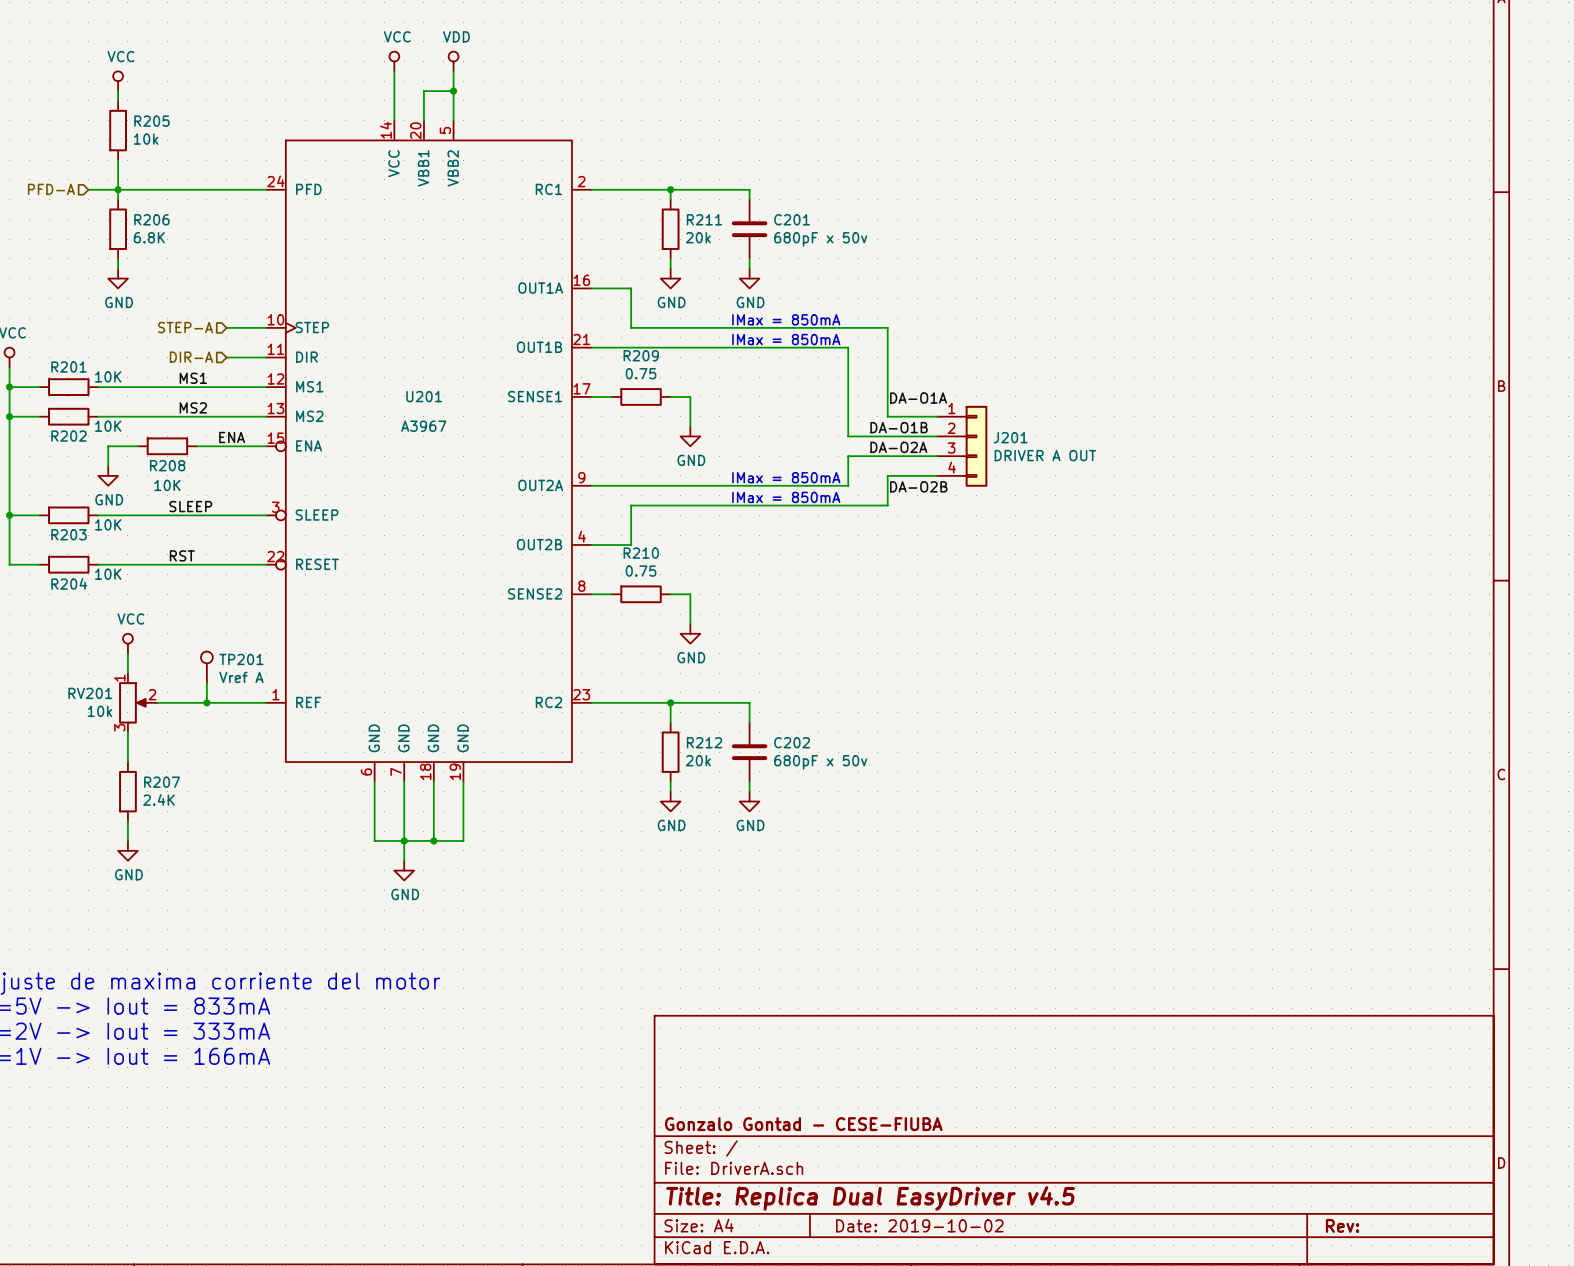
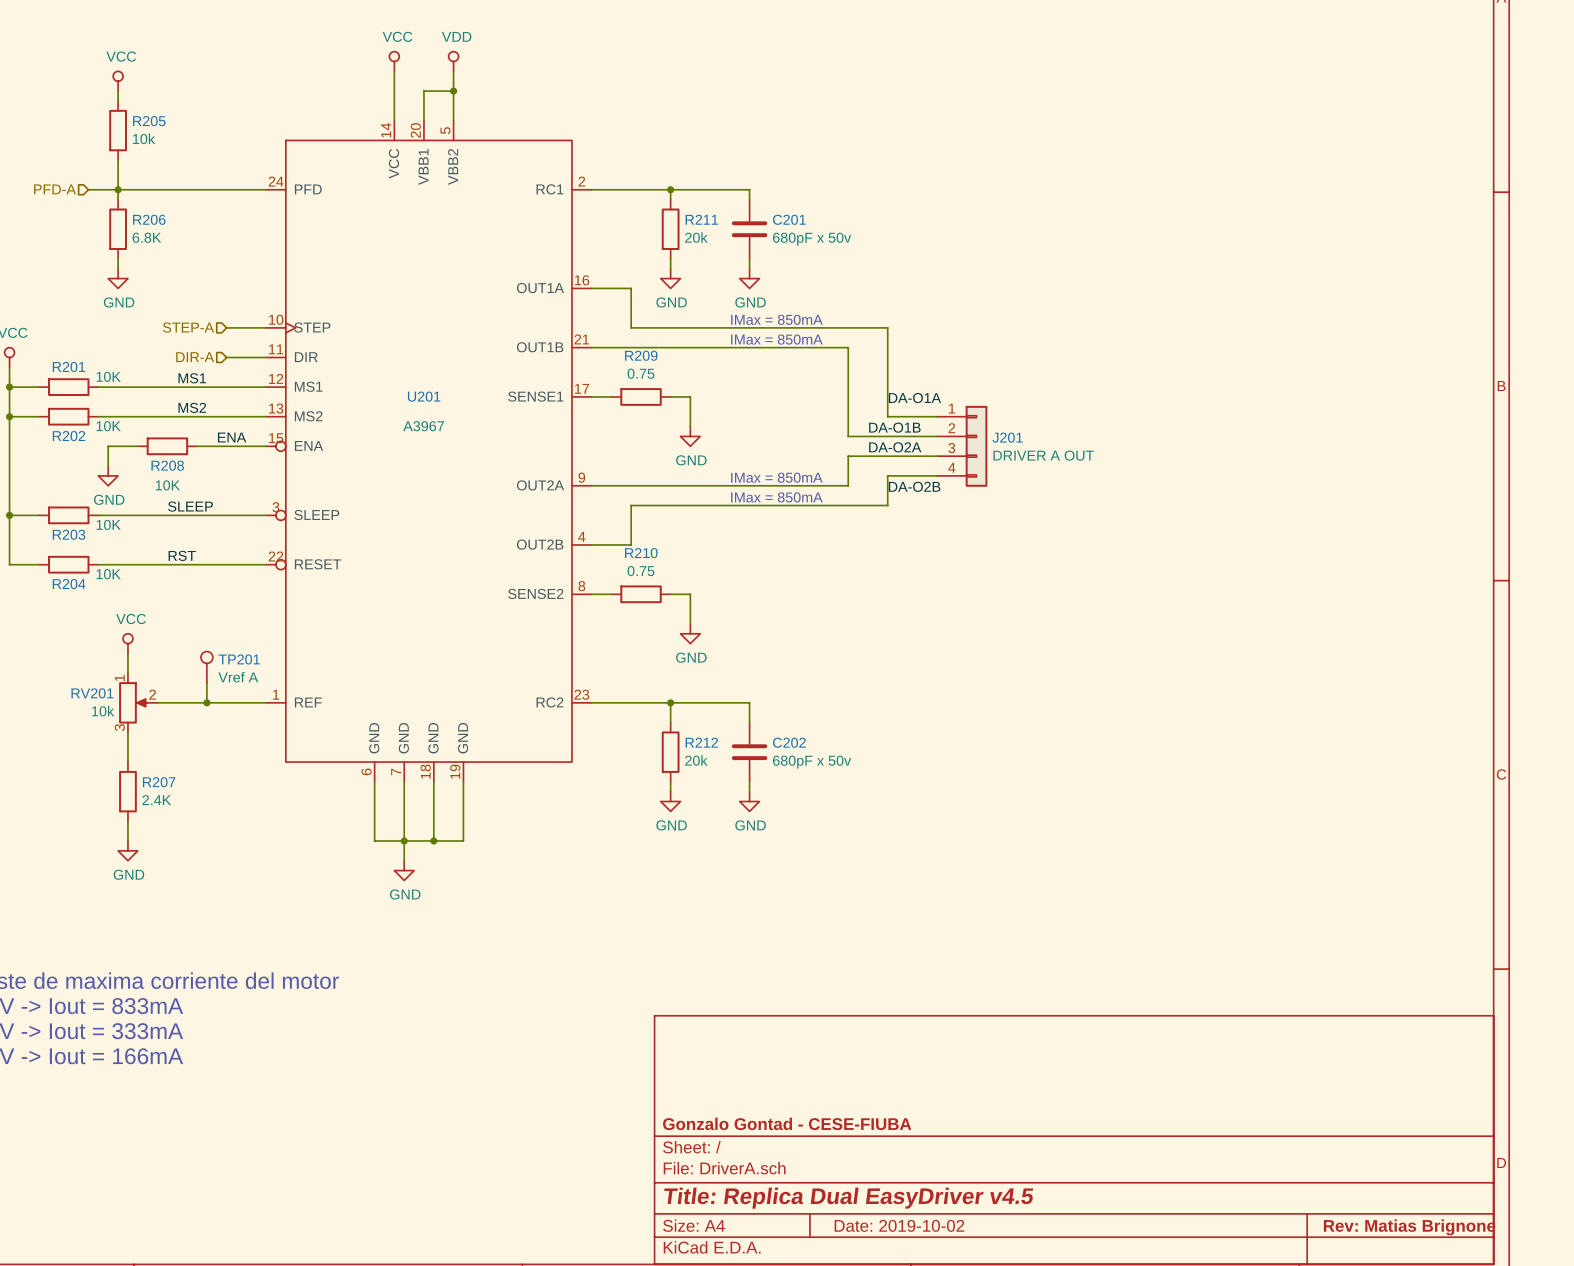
title block: Rev: (1342, 1225) -> Rev: Matias Brignone (1409, 1227)

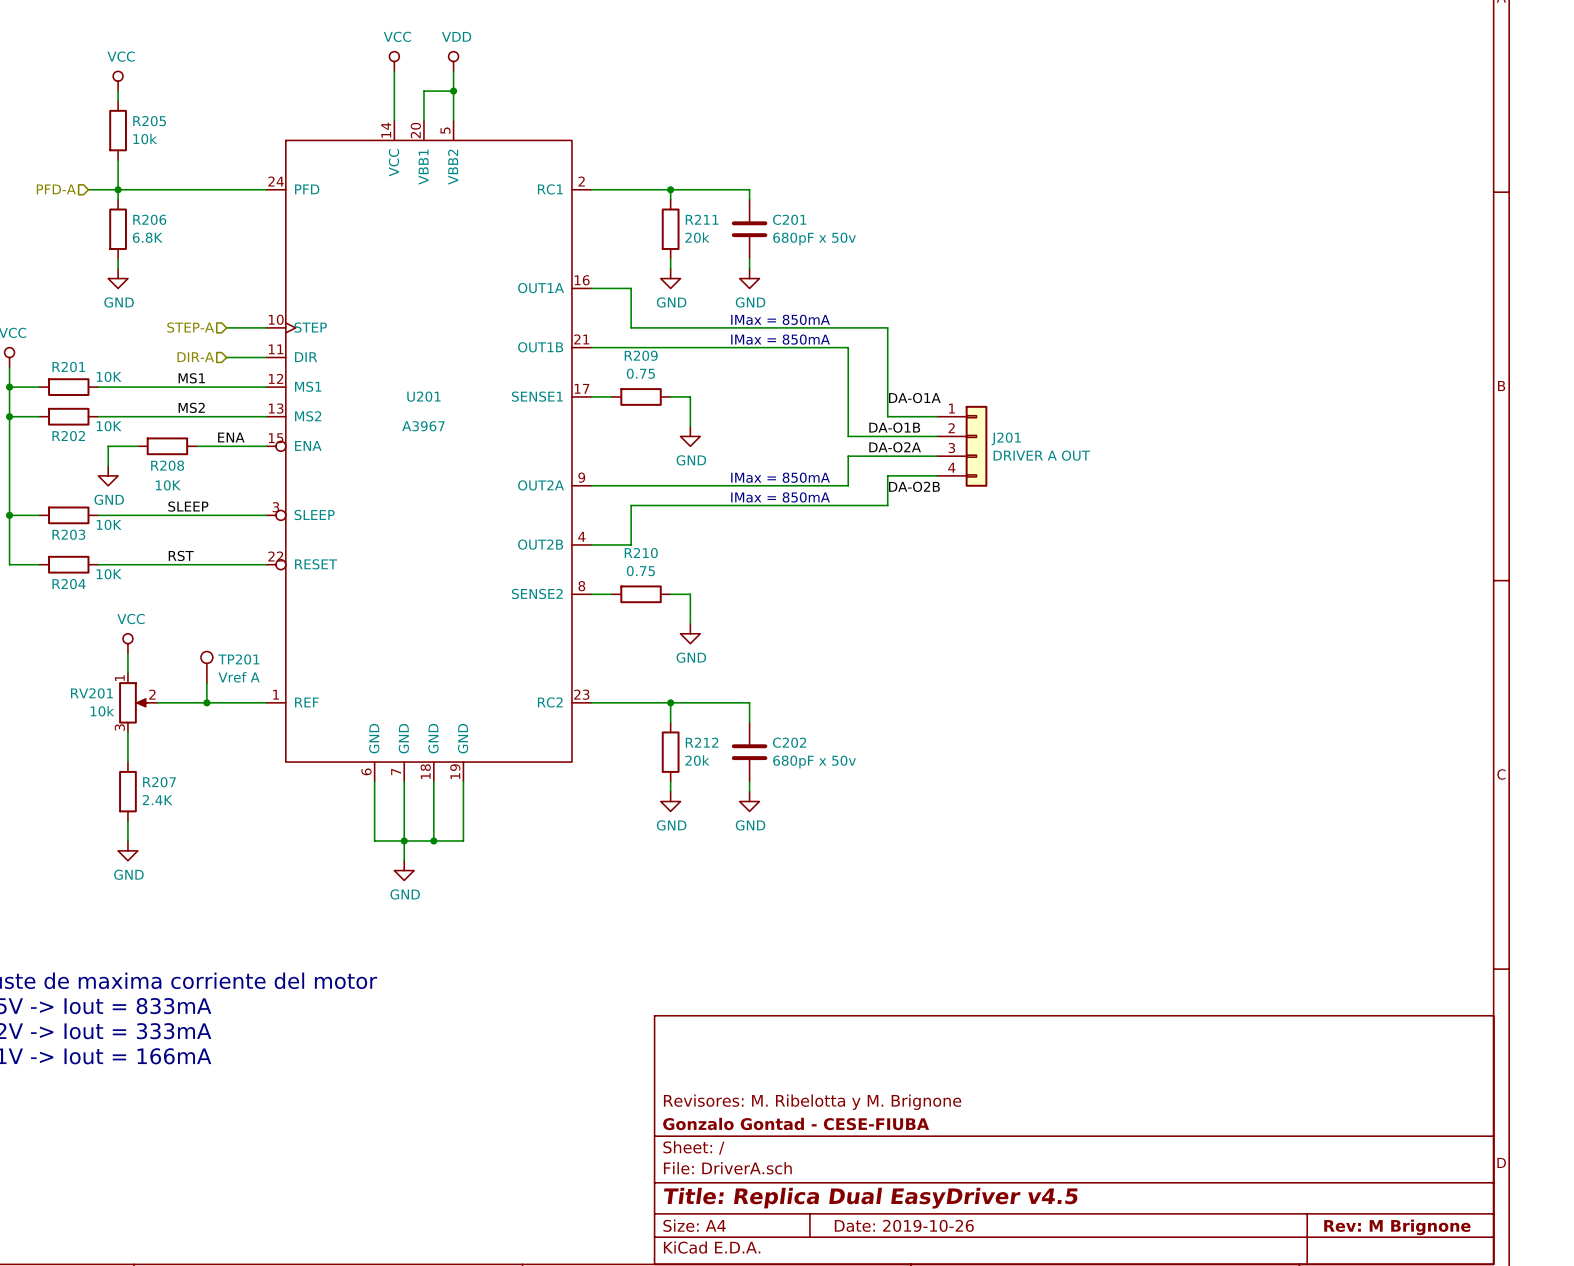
title block: none -> Revisores: M. Ribelotta y M. Brignone (812, 1102)
title block: Date: 2019-10-02 (899, 1225) -> Date: 2019-10-26 (904, 1225)
title block: Rev: Matias Brignone (1409, 1227) -> Rev: M Brignone (1397, 1227)

